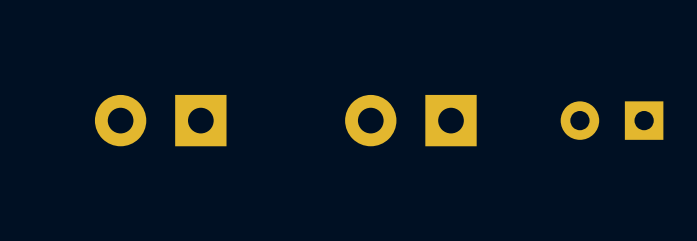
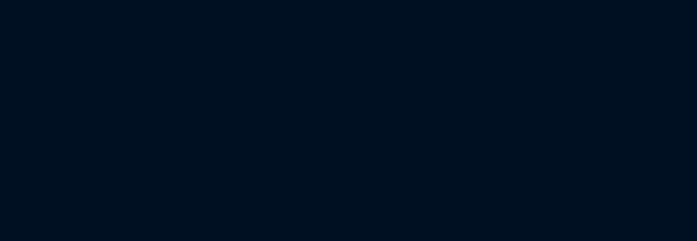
part: (160, 120) -> none
part: (410, 120) -> none
part: (612, 120) -> none

